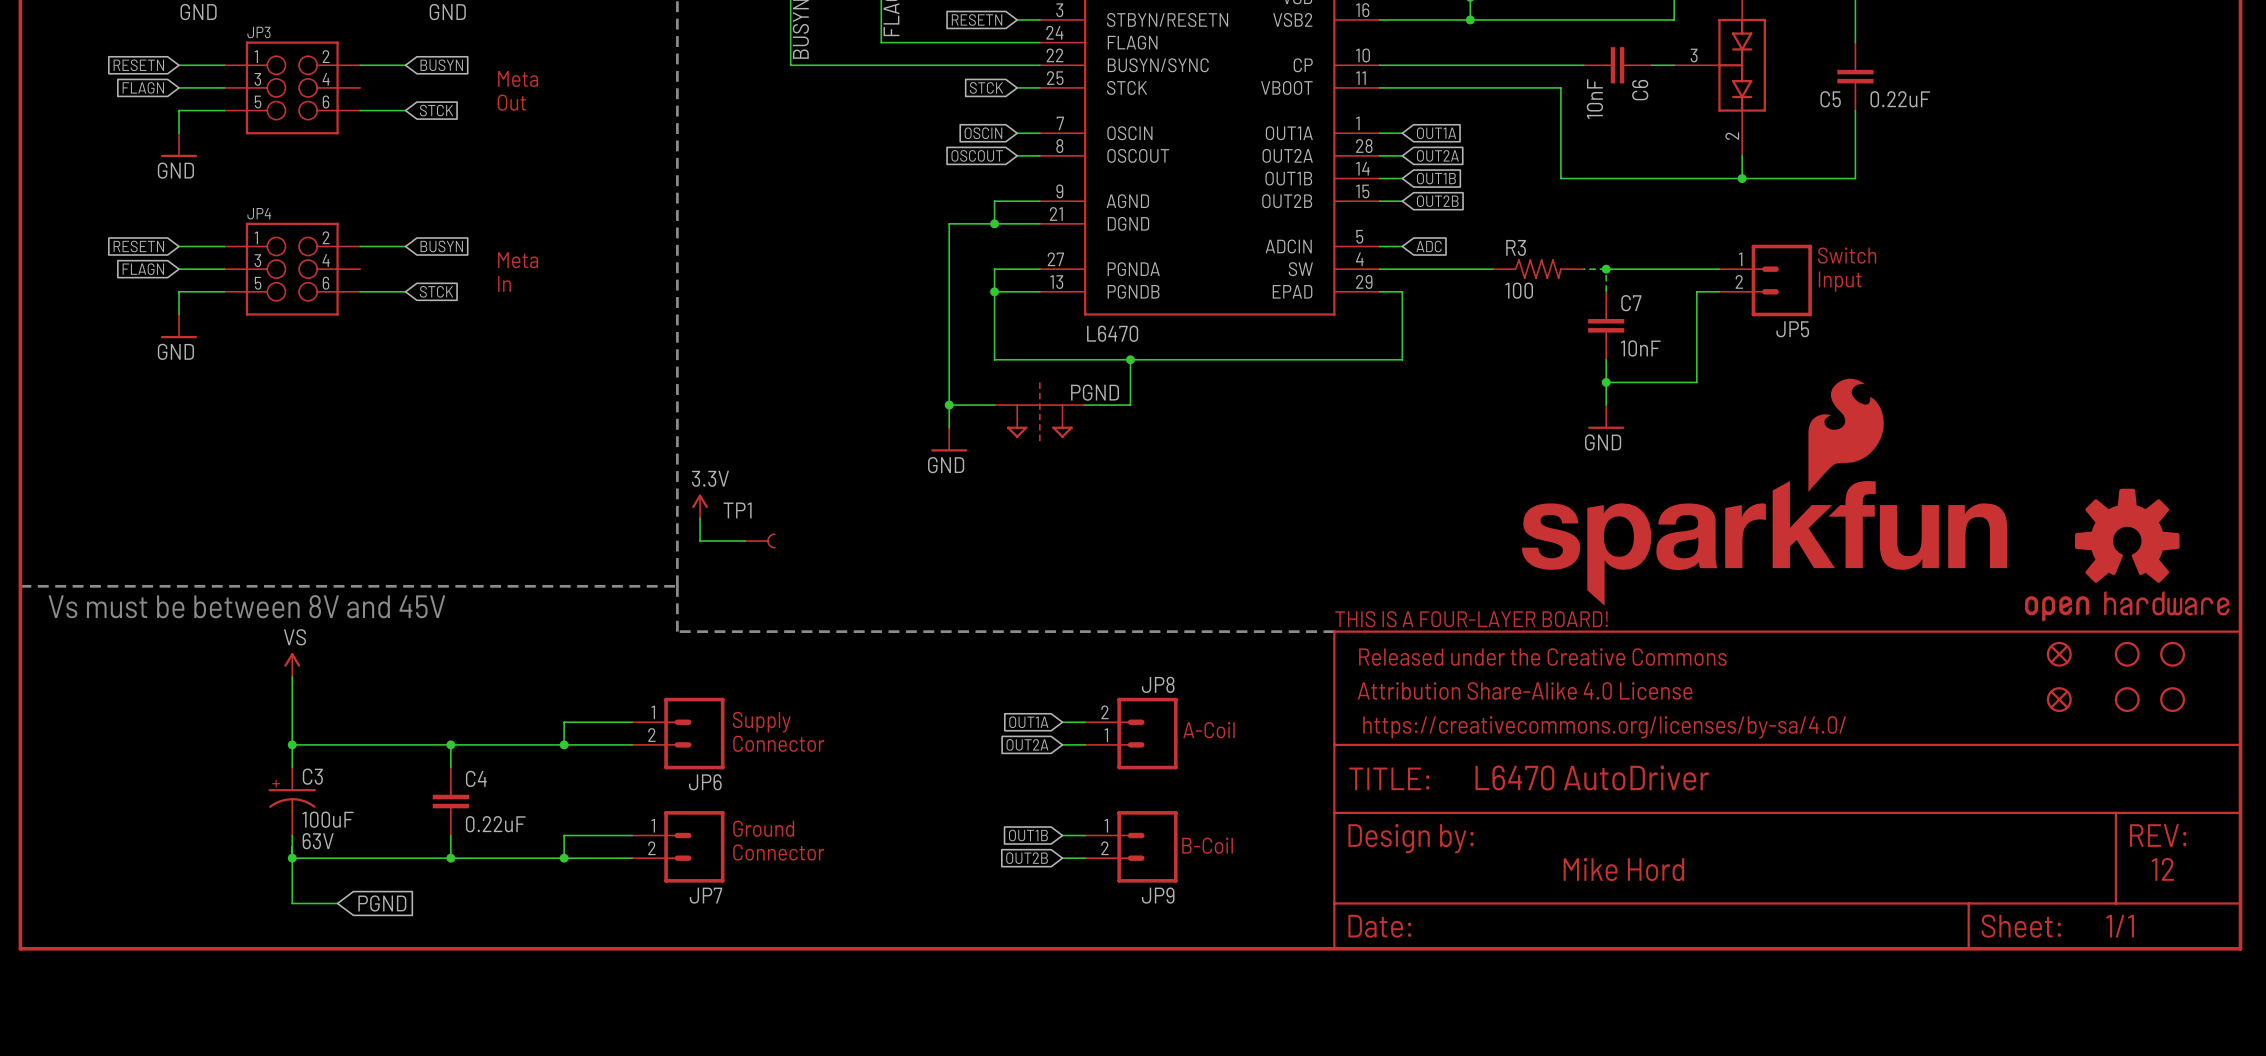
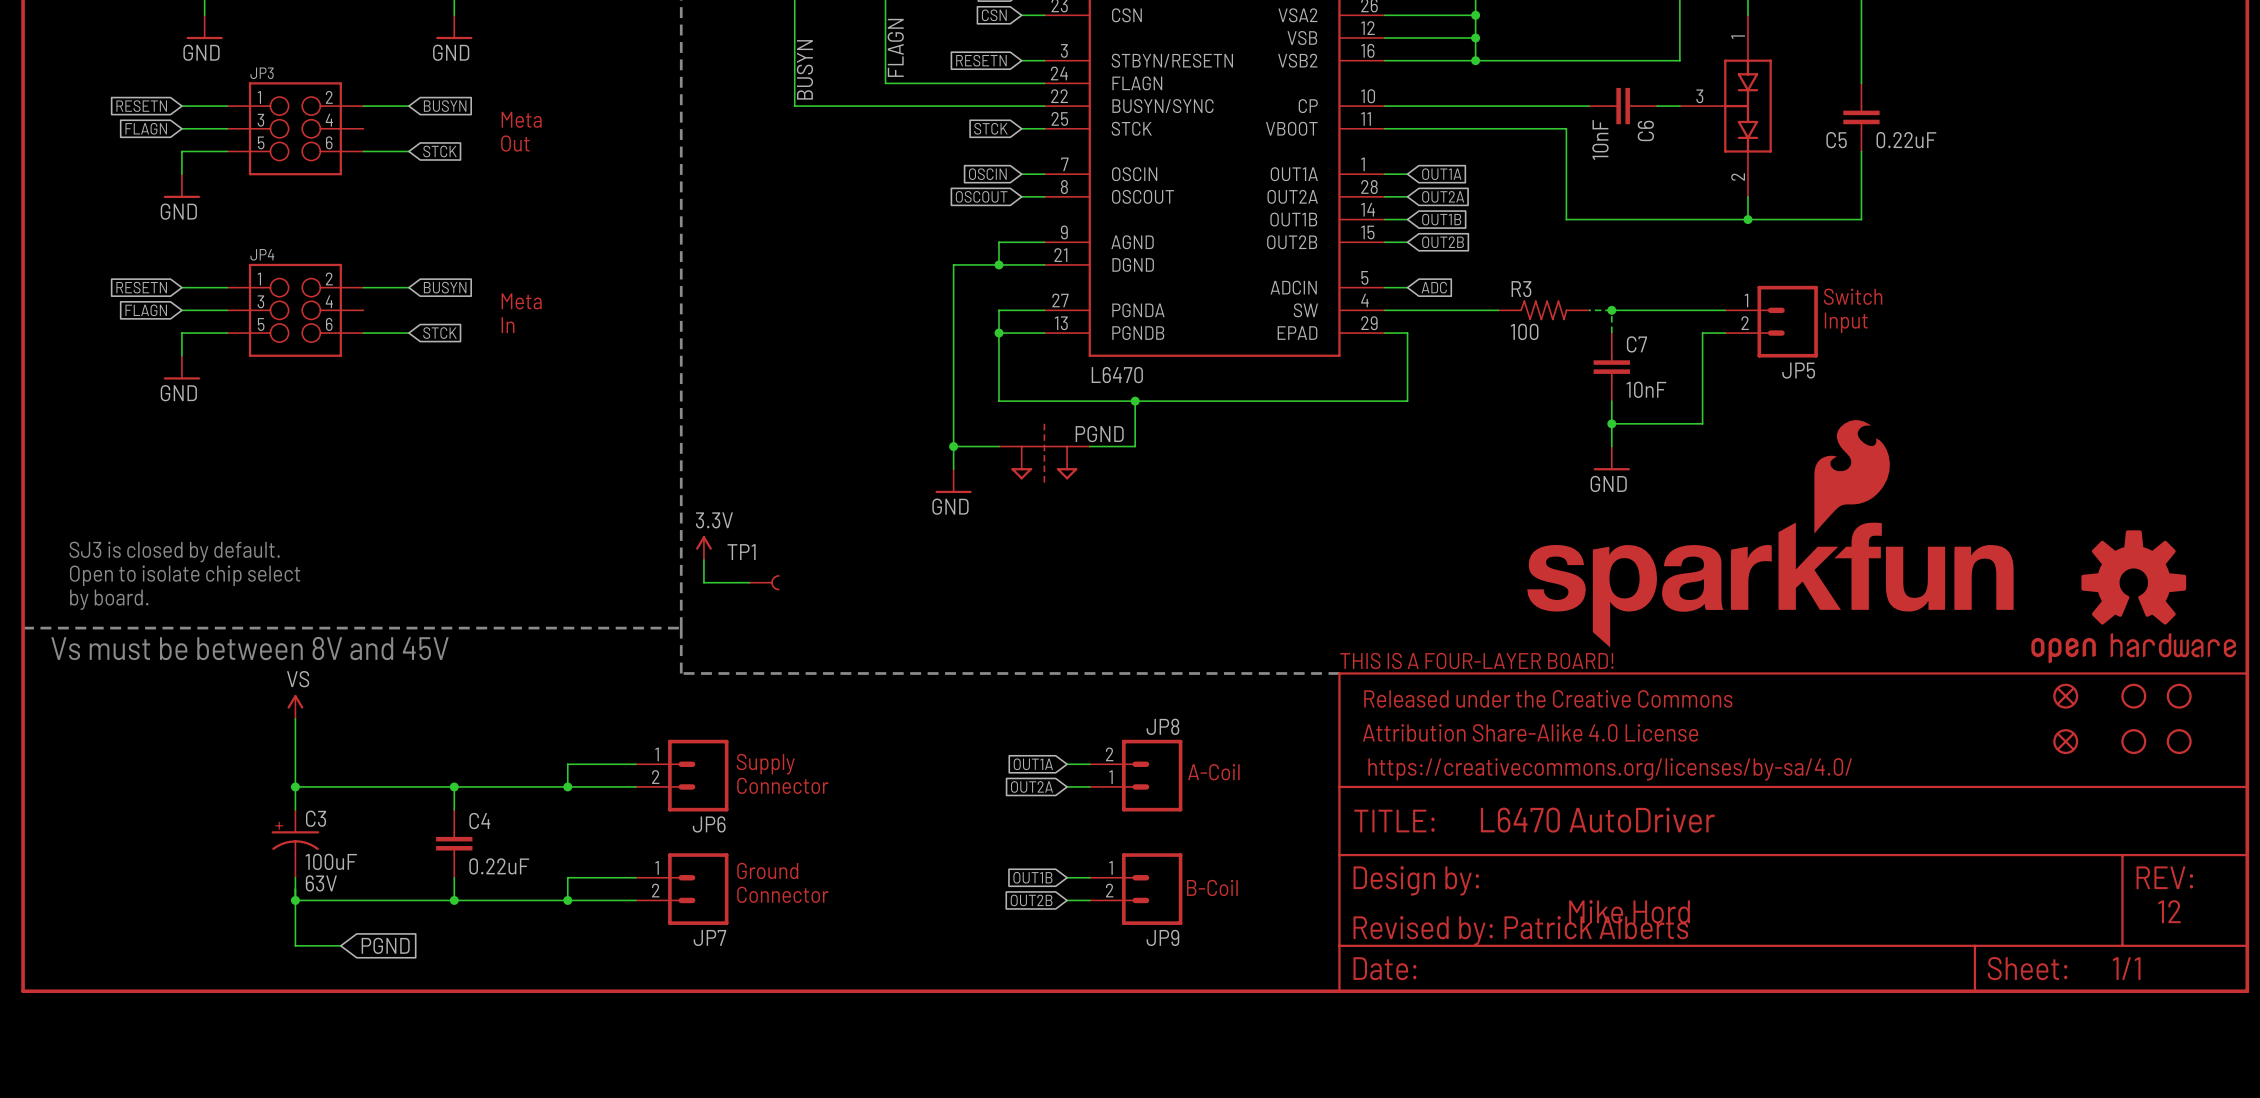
text: none -> SJ3 is closed by default. (174, 551)
text: none -> Open to isolate chip select (185, 575)
text: none -> by board. (109, 599)
text: none -> Revised by: Patrick Alberts (1520, 930)

